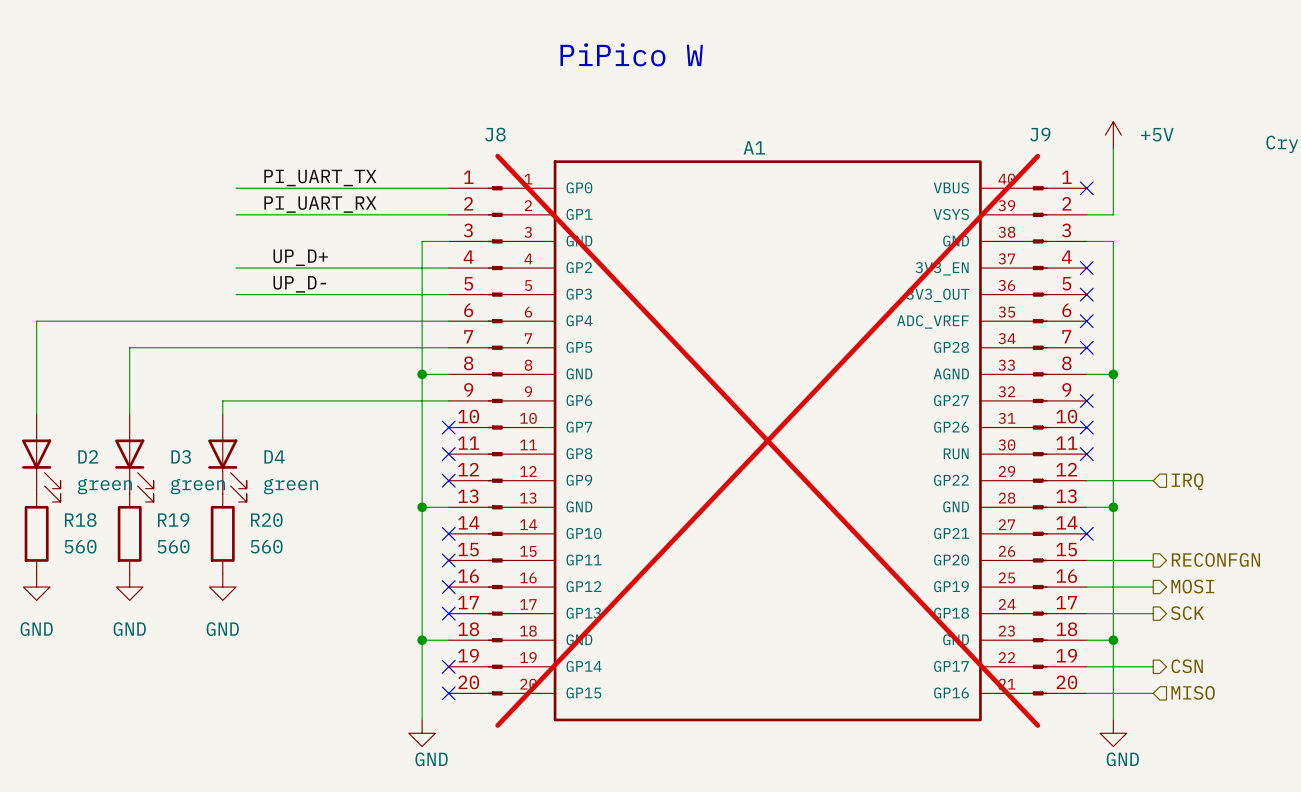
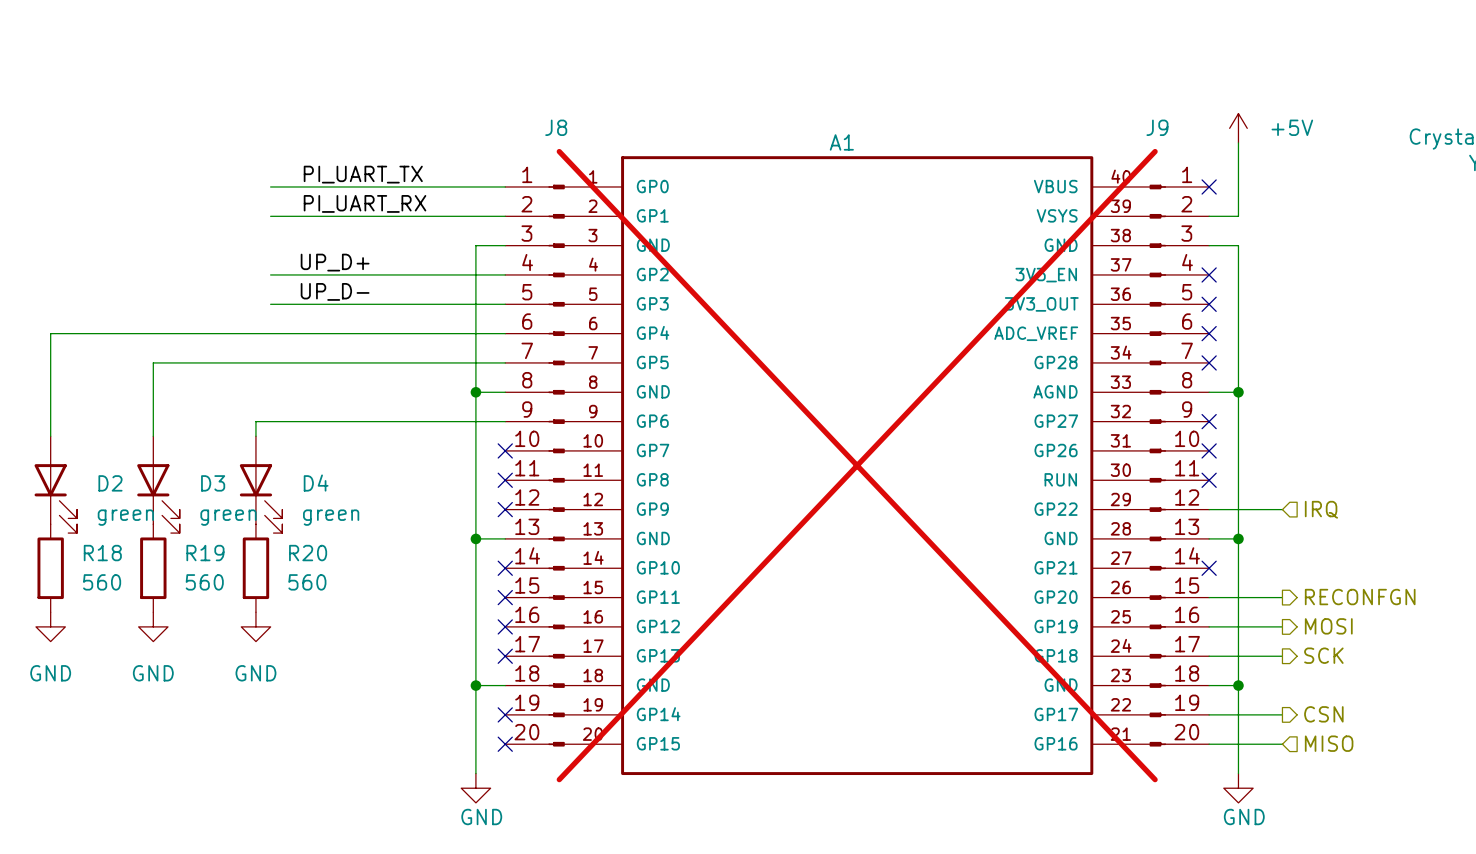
text: PiPico W (631, 54) -> none

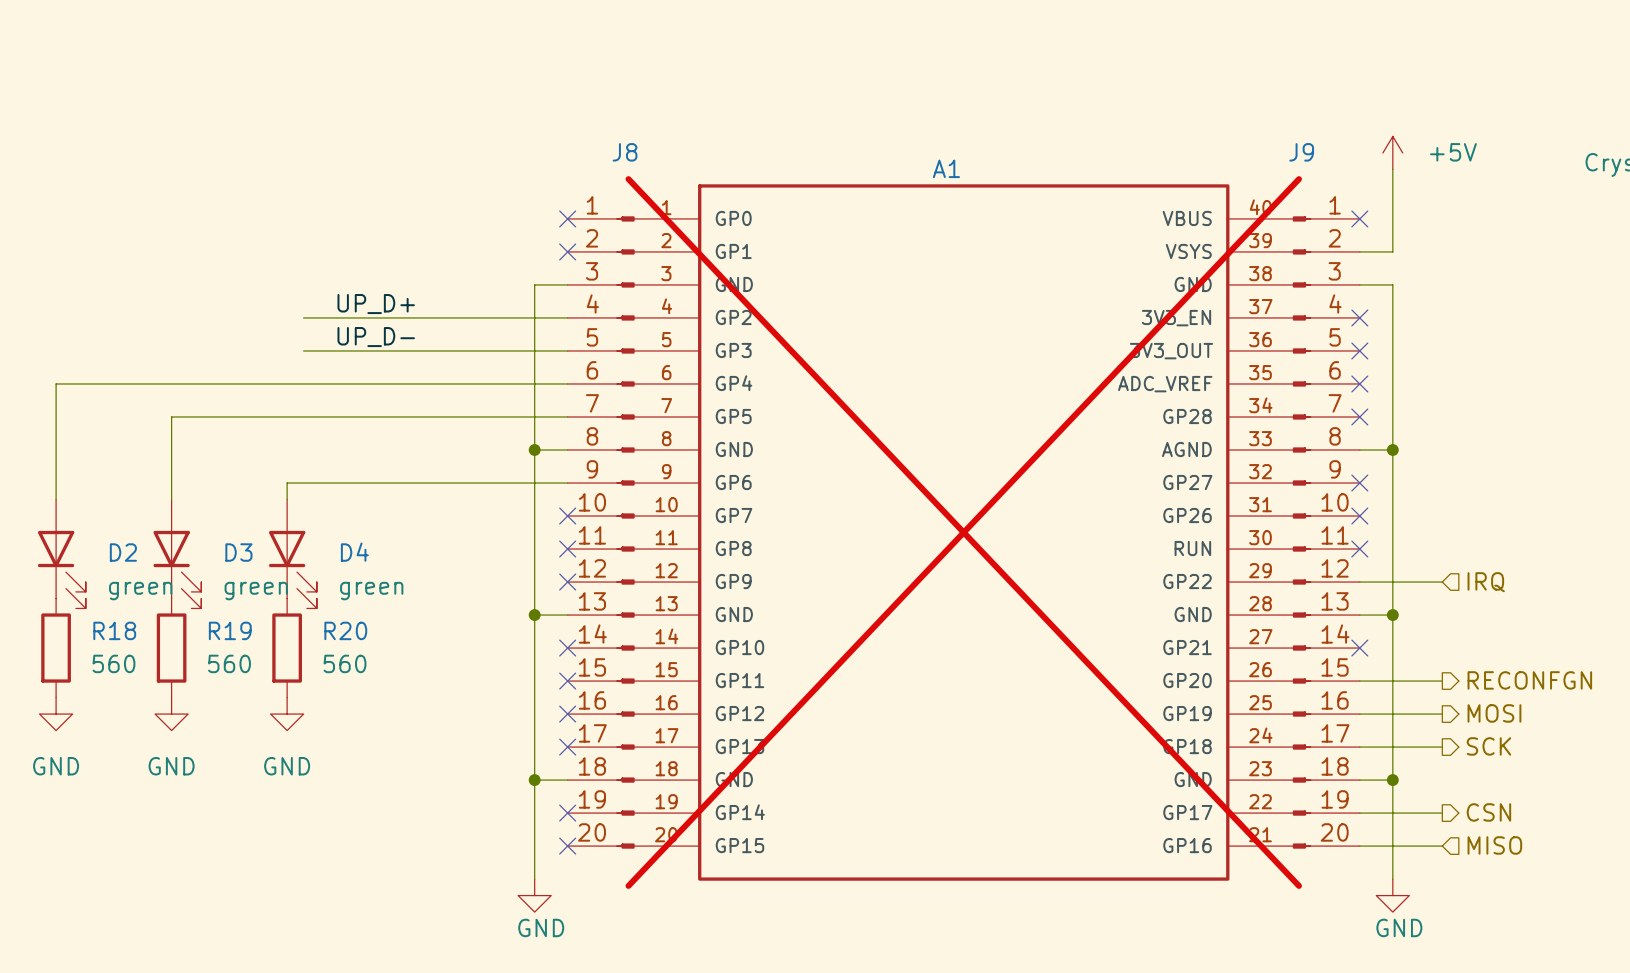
label: PI_UART_TX (363, 174) -> none
wire: (270, 186) (505, 186) -> none
no-connect mark: none -> (567, 218)
label: PI_UART_RX (365, 203) -> none
wire: (270, 216) (505, 216) -> none
no-connect mark: none -> (567, 251)

